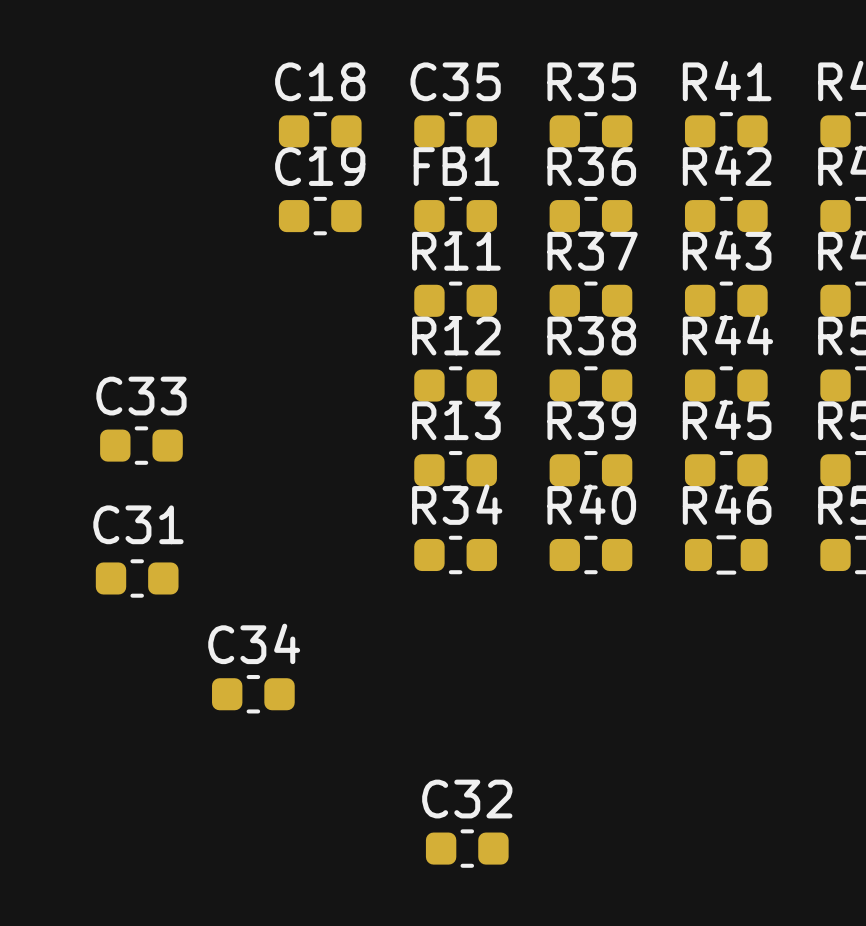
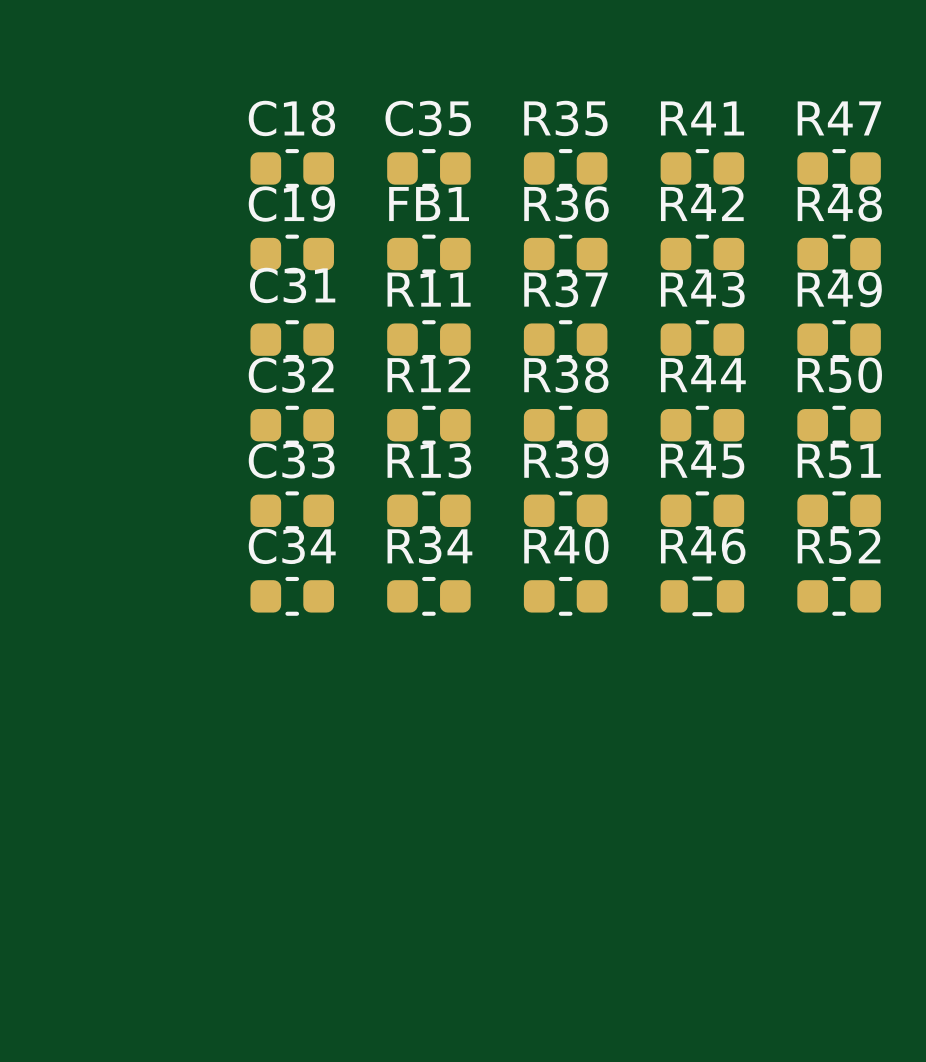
C33 position: (141, 445) -> (292, 510)
C31 position: (137, 578) -> (292, 339)
C34 position: (253, 694) -> (292, 596)
C32 position: (467, 848) -> (292, 425)

